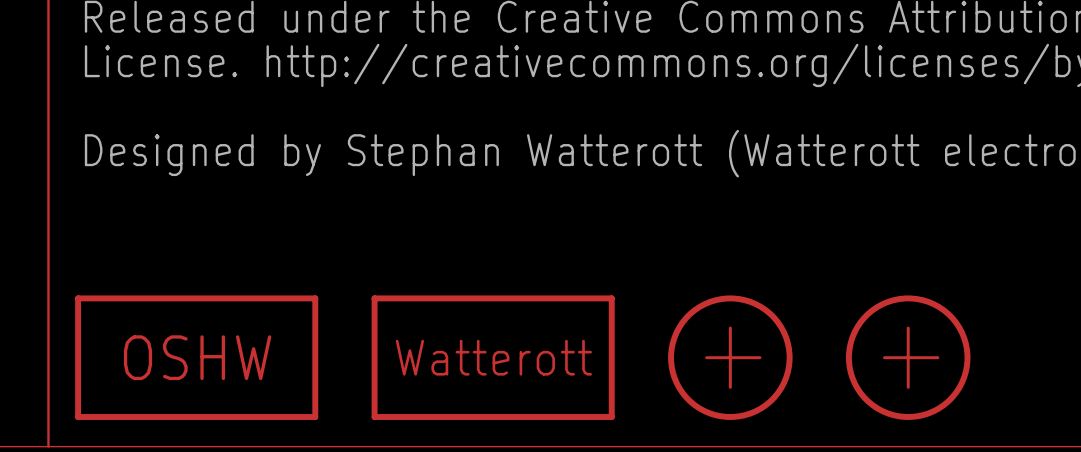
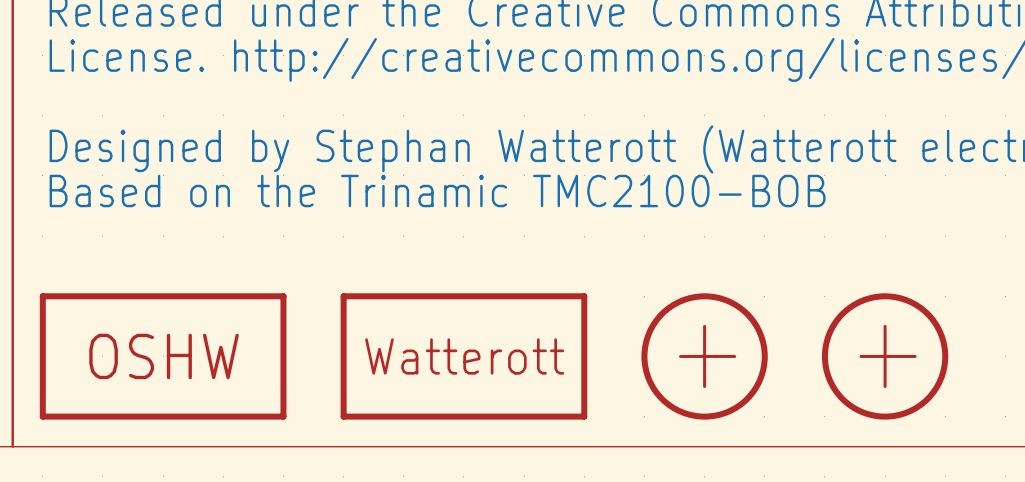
text: none -> Based on the Trinamic TMC2100-BOB (437, 191)

